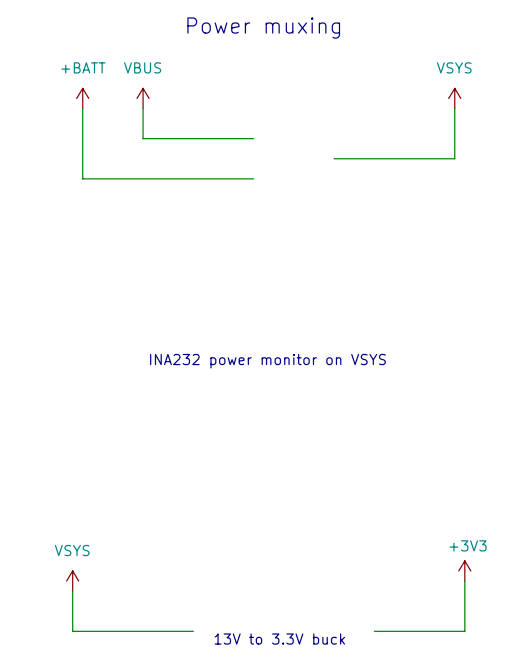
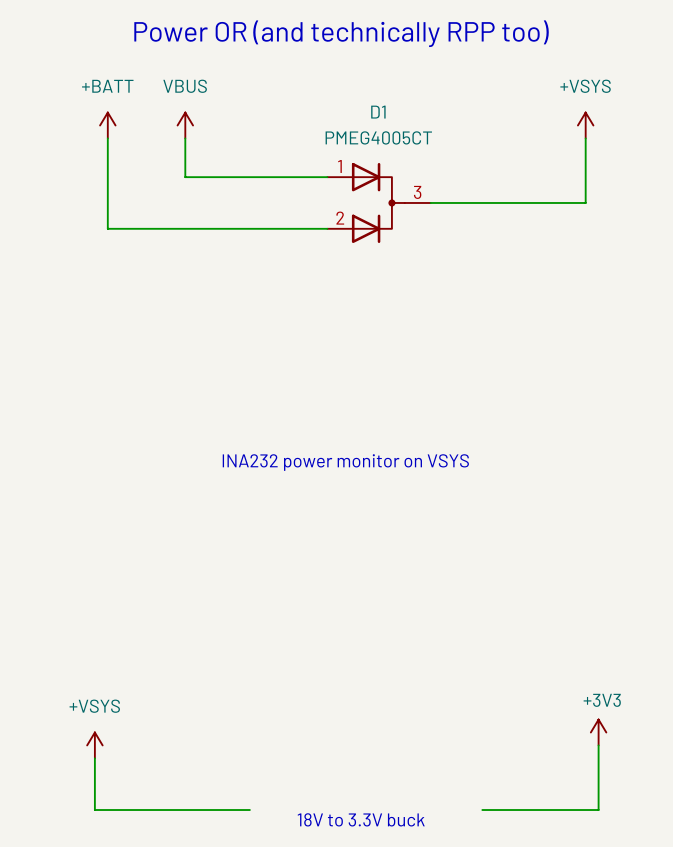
text: Power muxing (263, 28) -> Power OR (and technically RPP too) (341, 33)
power symbol: VSYS (454, 98) -> +VSYS (585, 125)
D1: none -> PMEG4005CT (379, 202)
power symbol: VSYS (72, 581) -> +VSYS (94, 745)
text: 13V to 3.3V buck (279, 639) -> 18V to 3.3V buck (361, 819)

